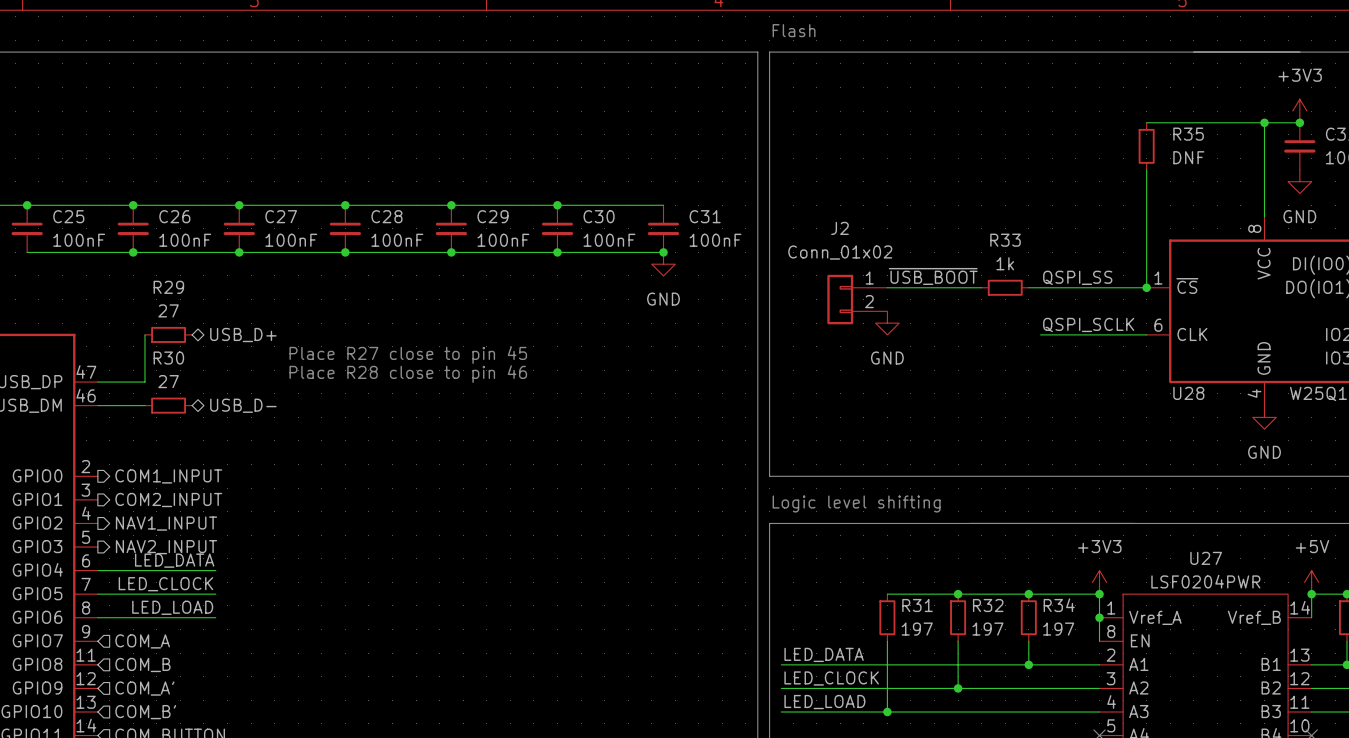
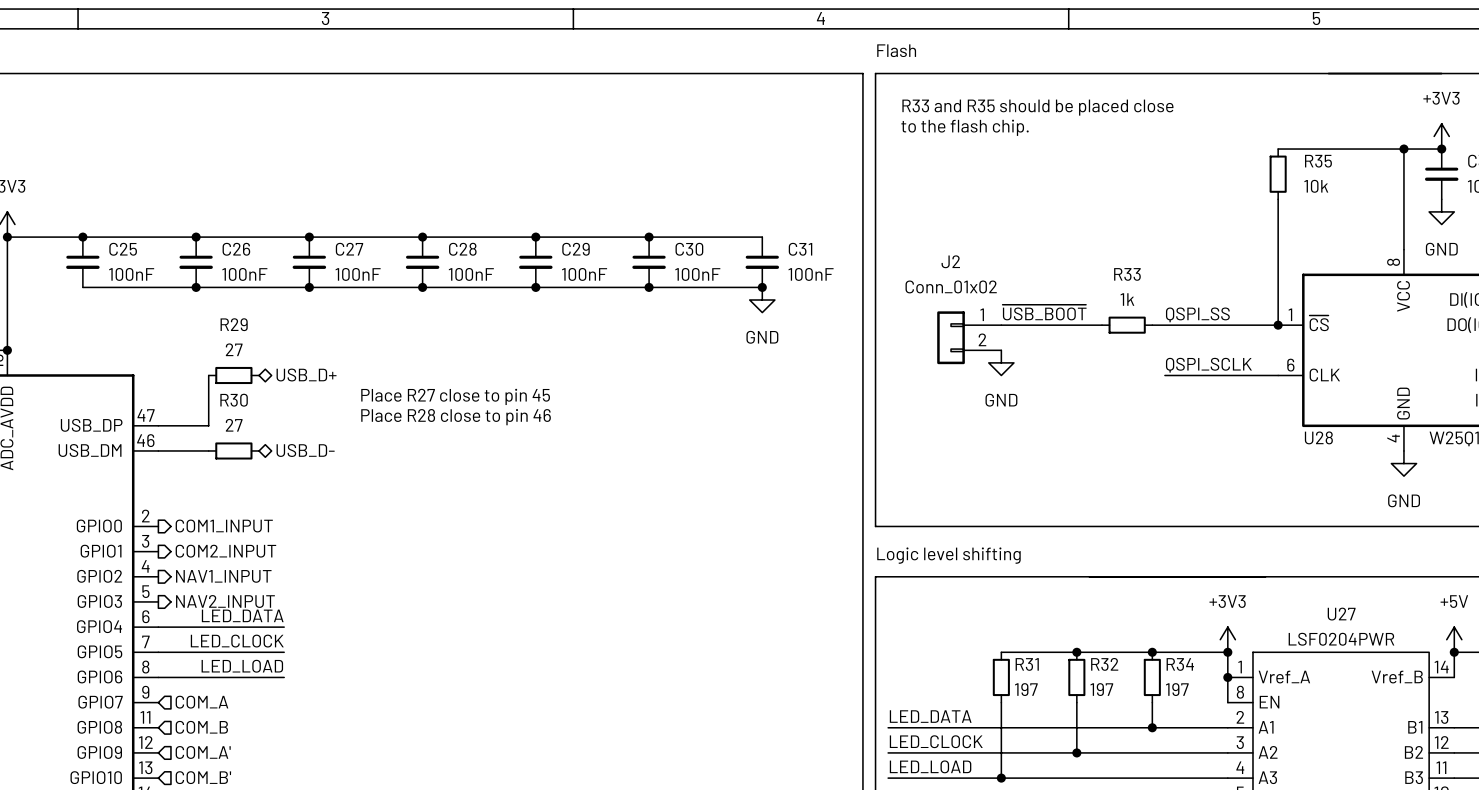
text: none -> R33 and R35 should be placed close (1037, 107)
text: none -> to the flash chip. (965, 127)
R35 value: DNF (1188, 157) -> 10k (1316, 186)

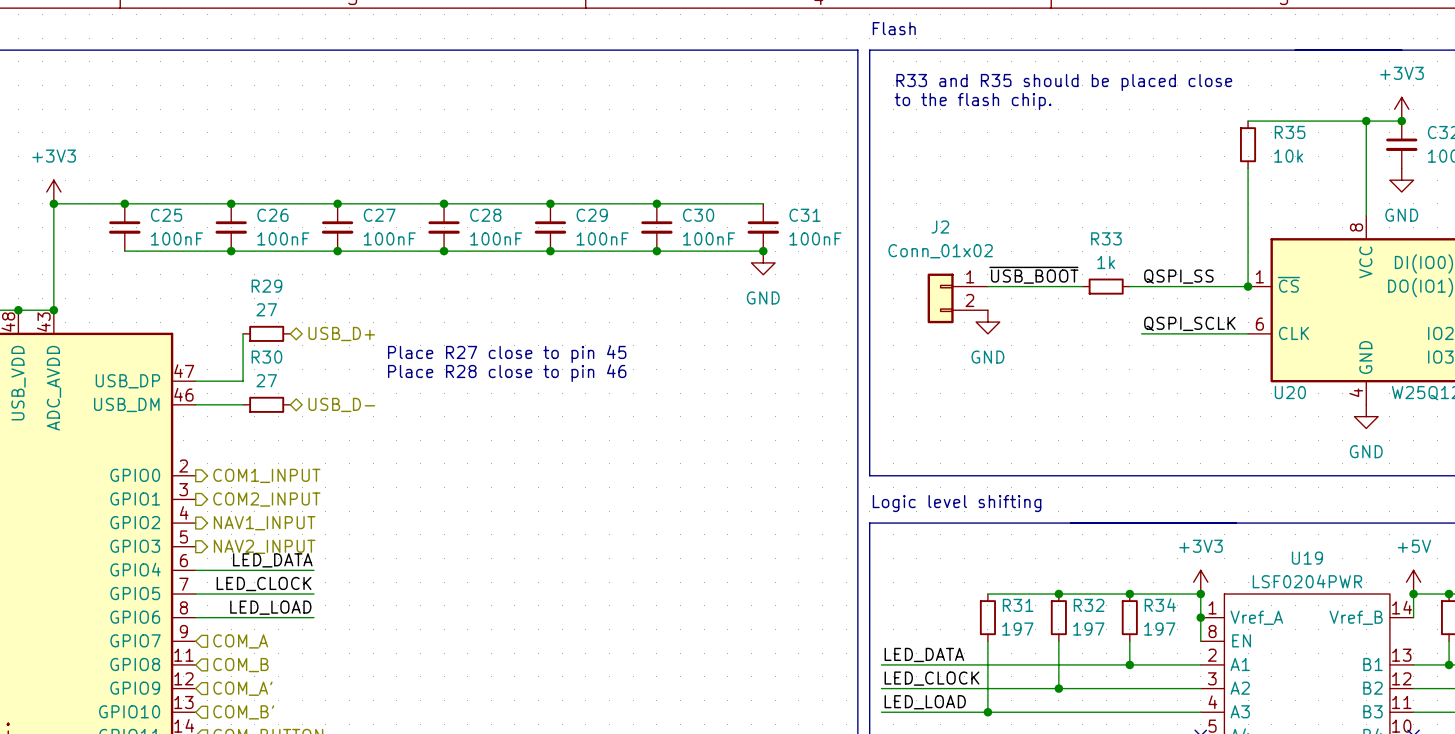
U28 name: U28 (1318, 437) -> U20 (1290, 392)
U27 name: U27 (1341, 614) -> U19 (1307, 558)

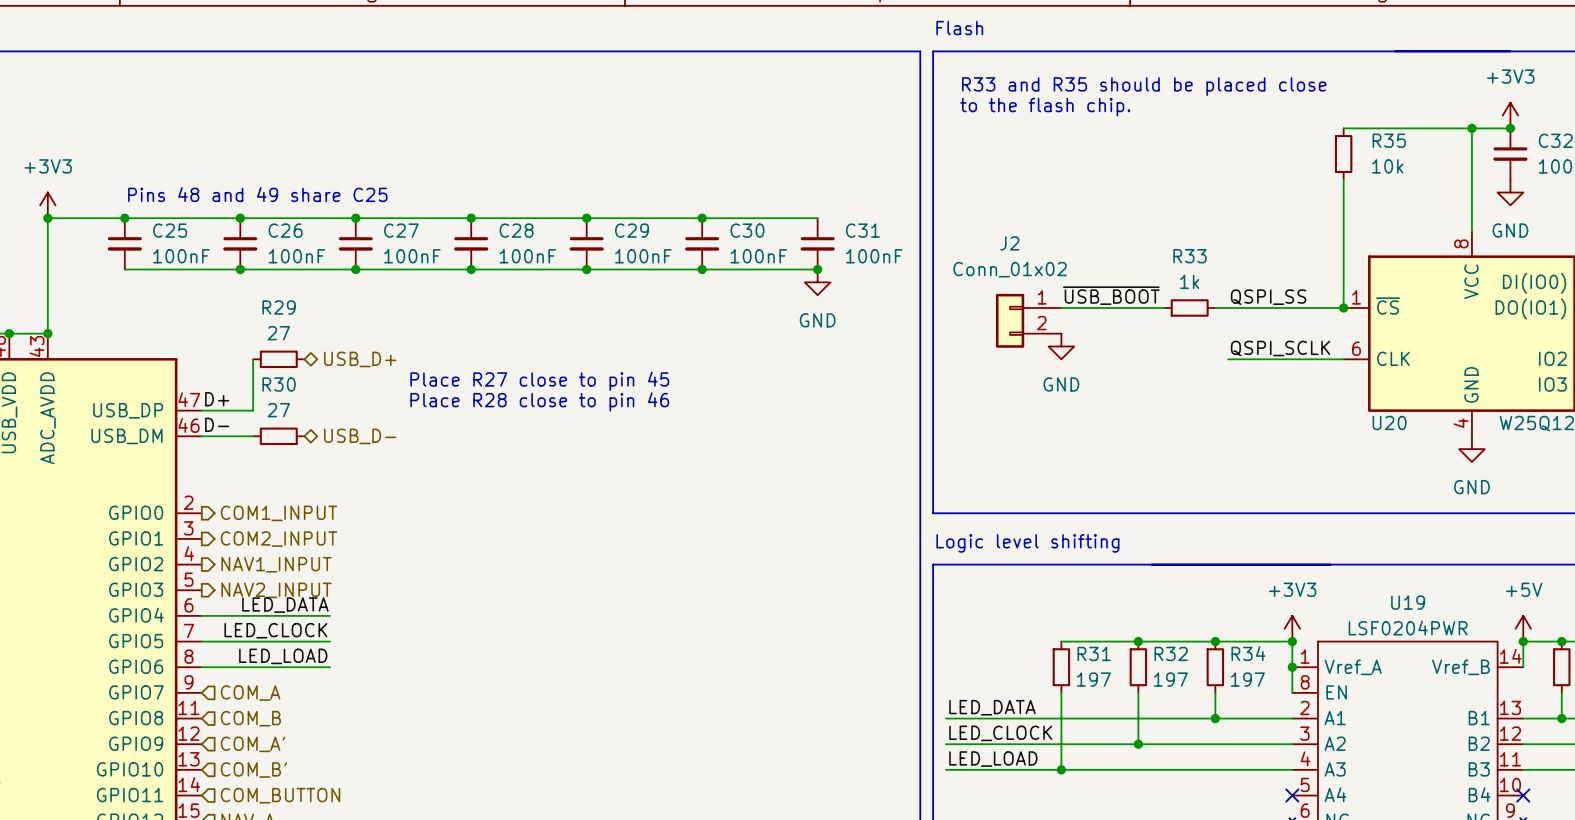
text: none -> Pins 48 and 49 share C25 (257, 194)
label: none -> D+ (217, 399)
label: none -> D- (217, 424)

